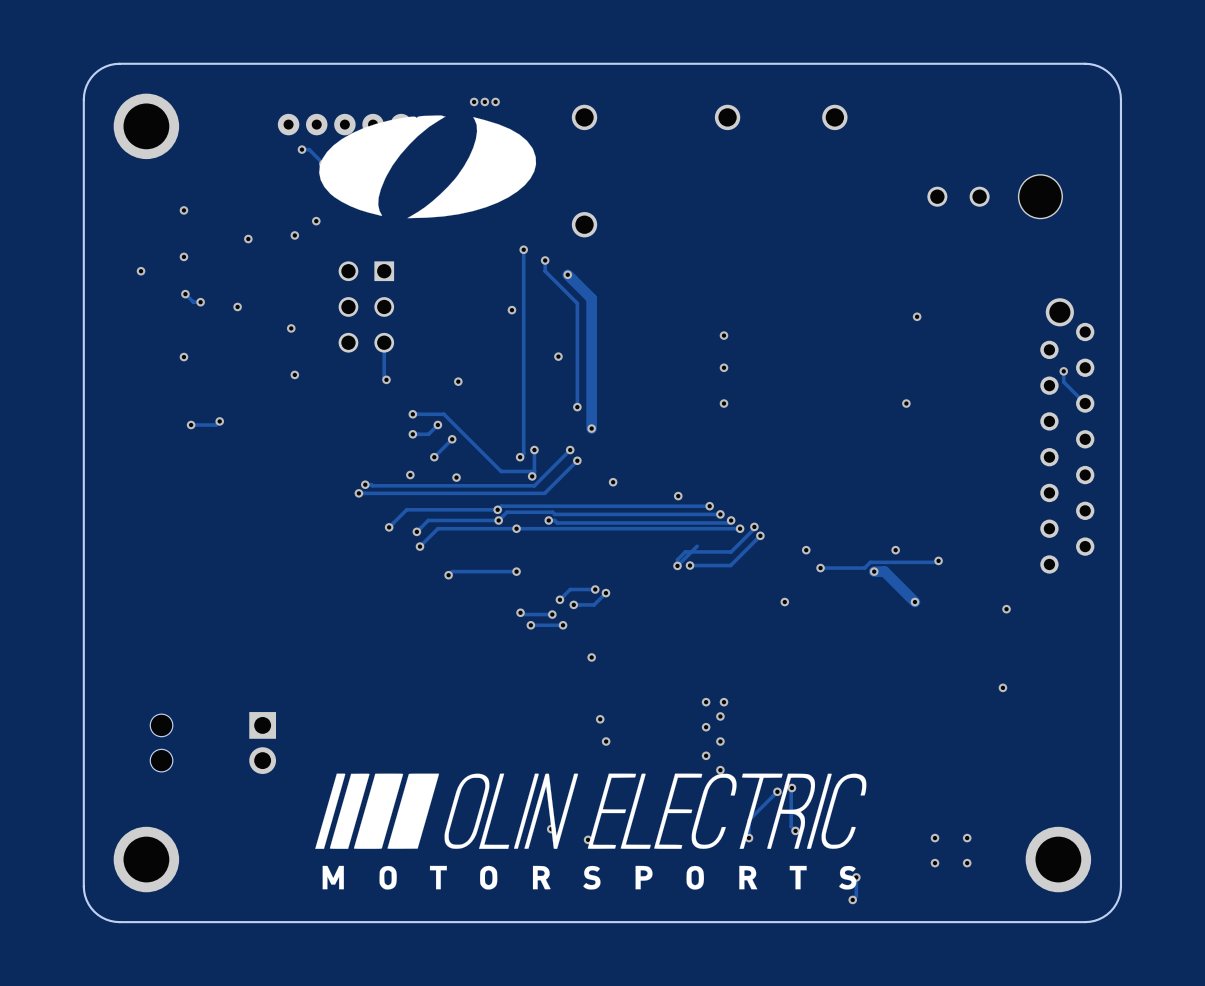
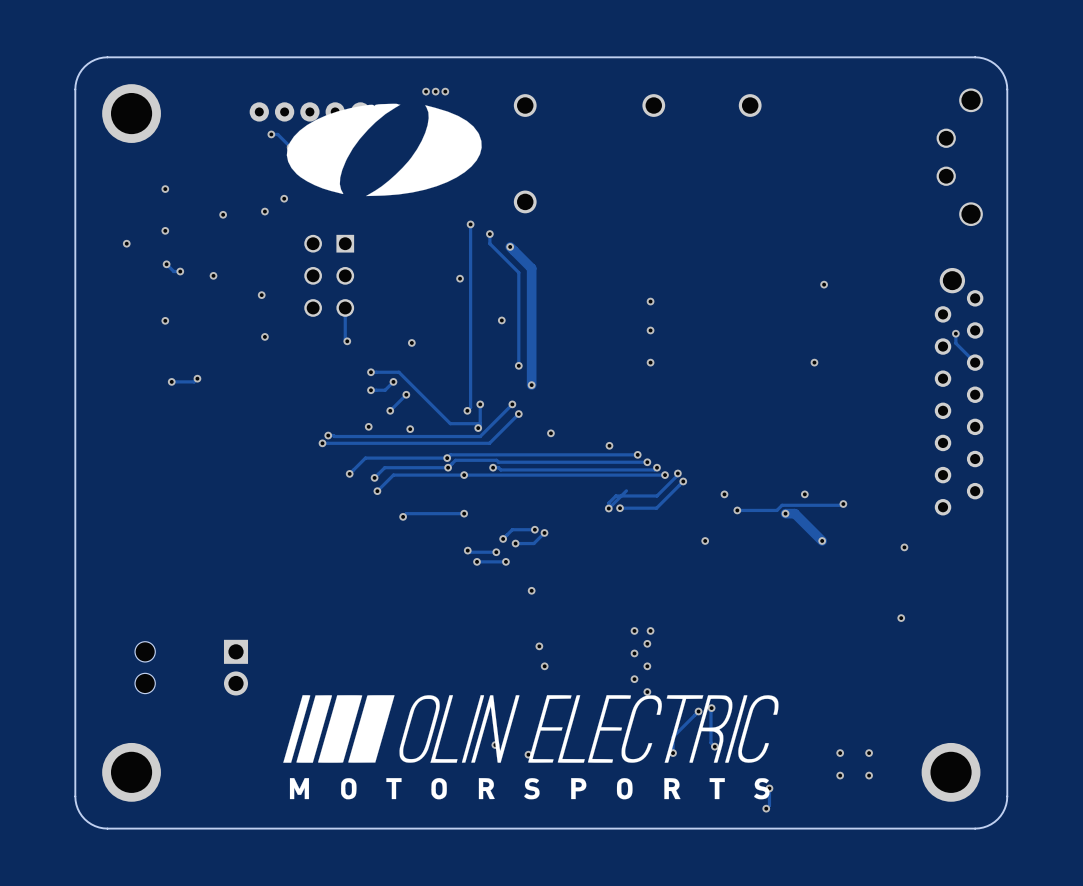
part: none -> (959, 157)
part: (995, 196) -> none

